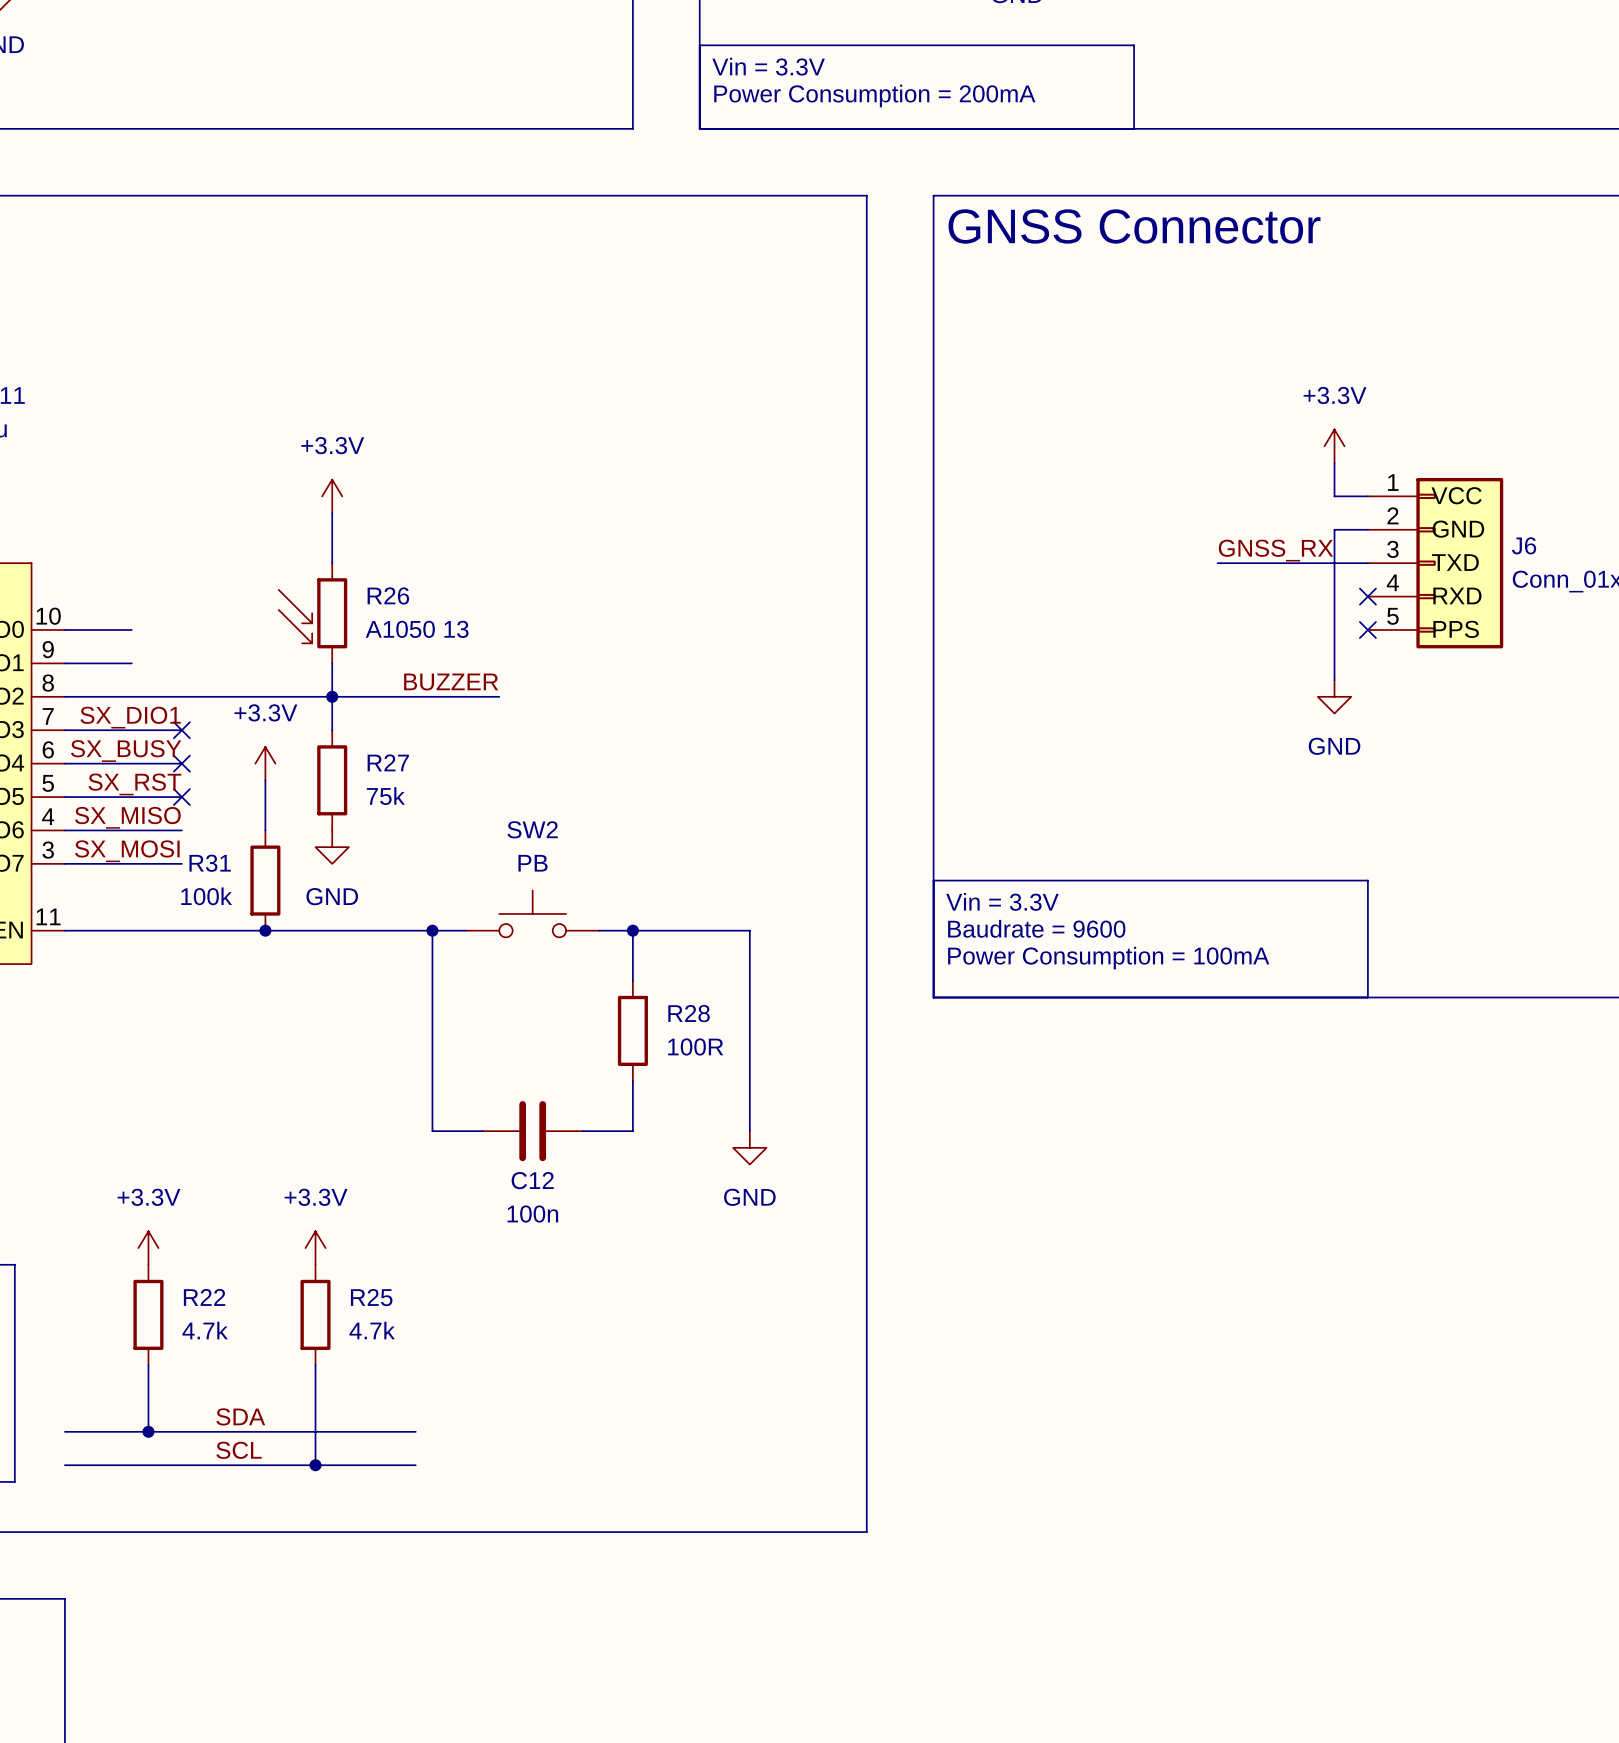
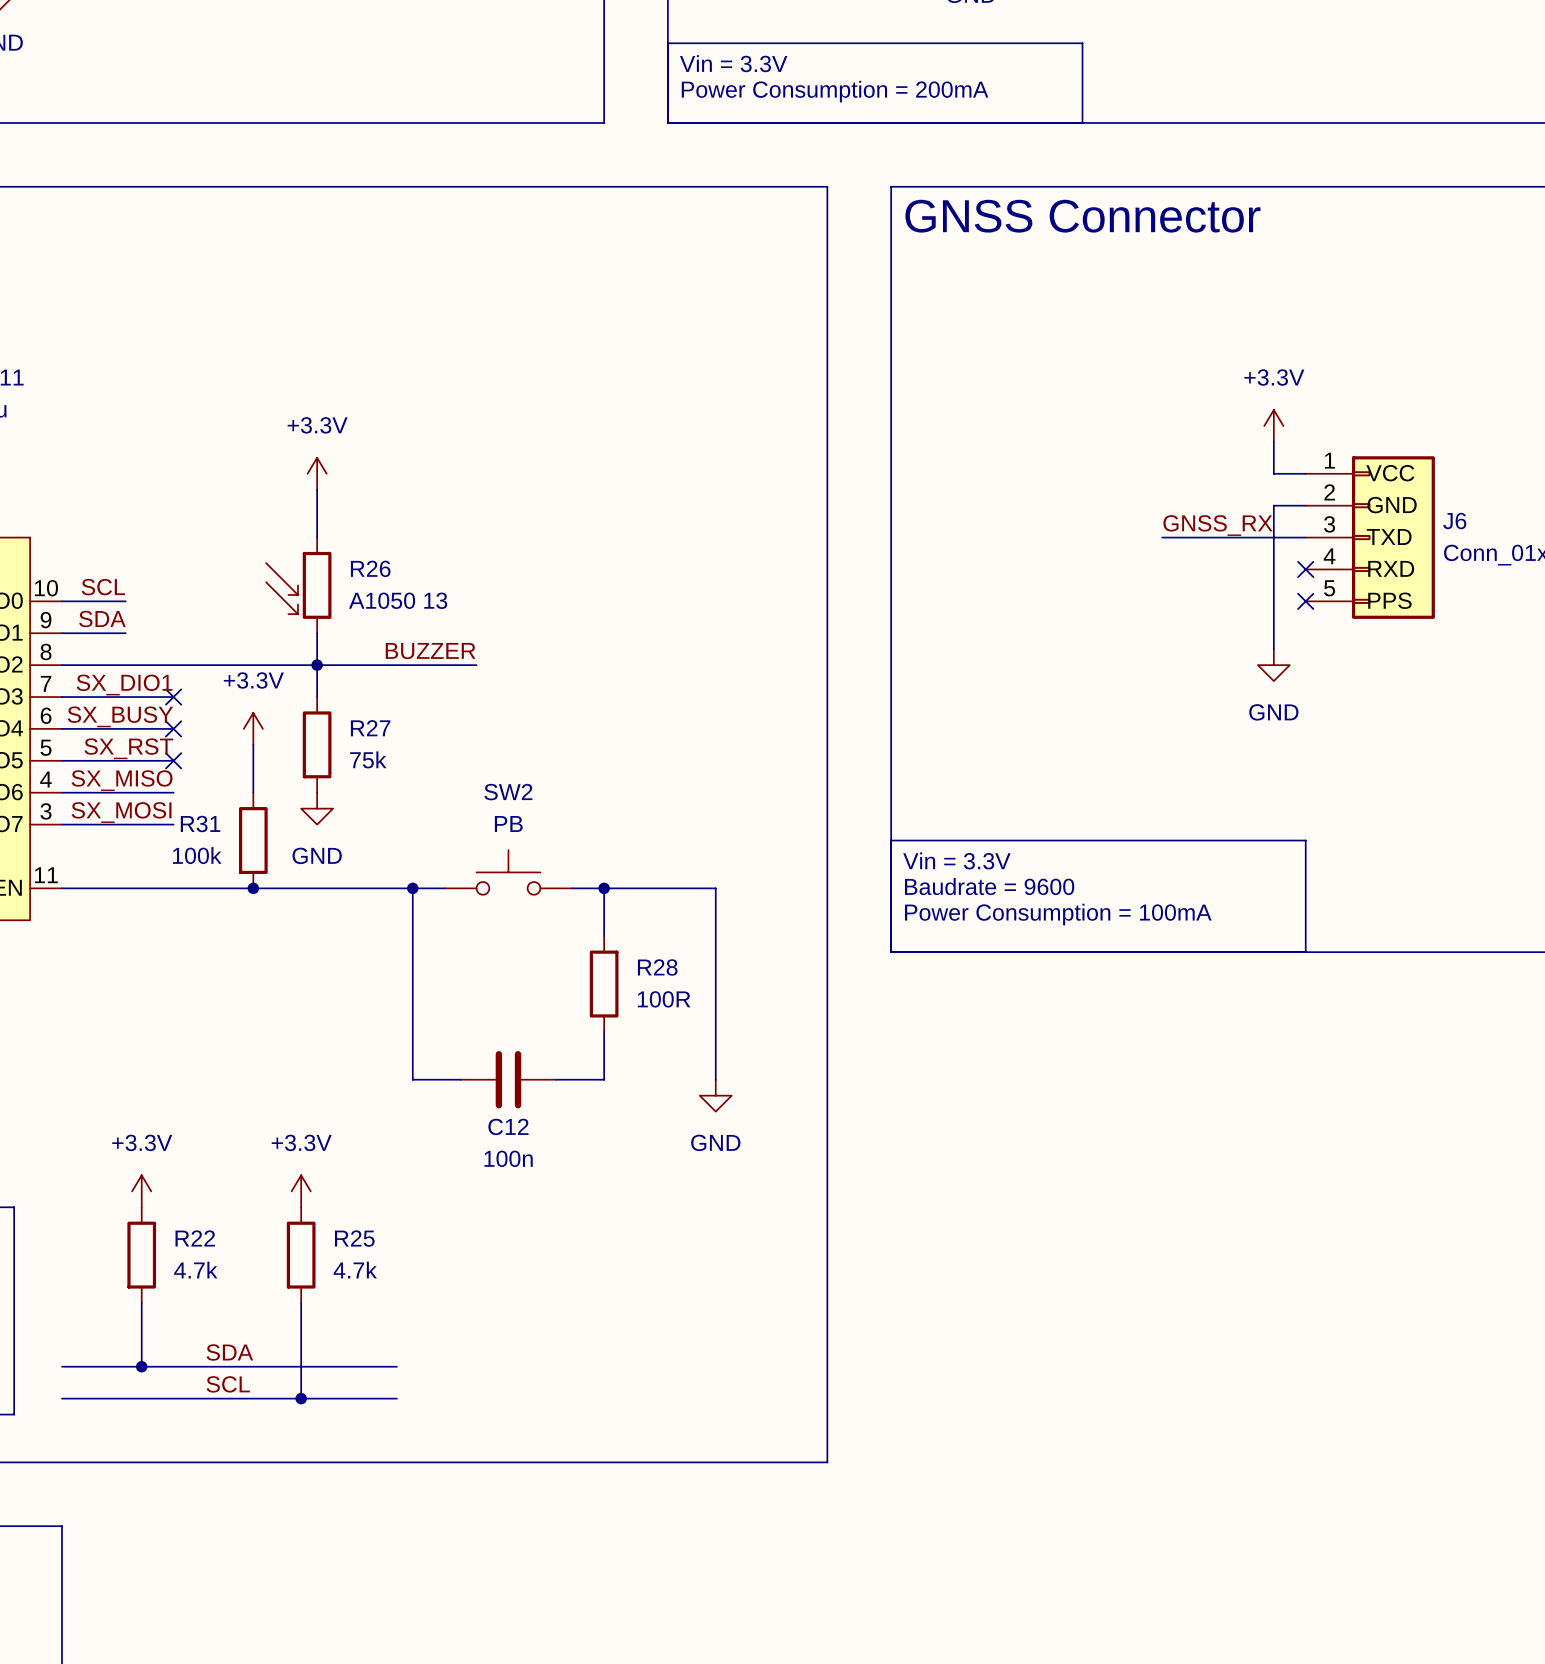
label: none -> SCL (103, 587)
label: none -> SDA (102, 619)

